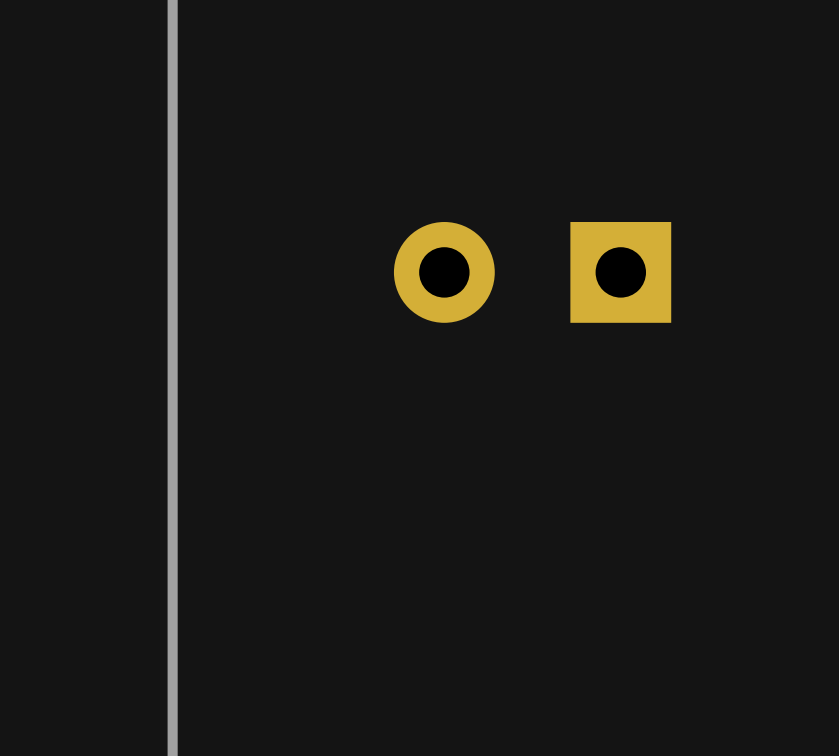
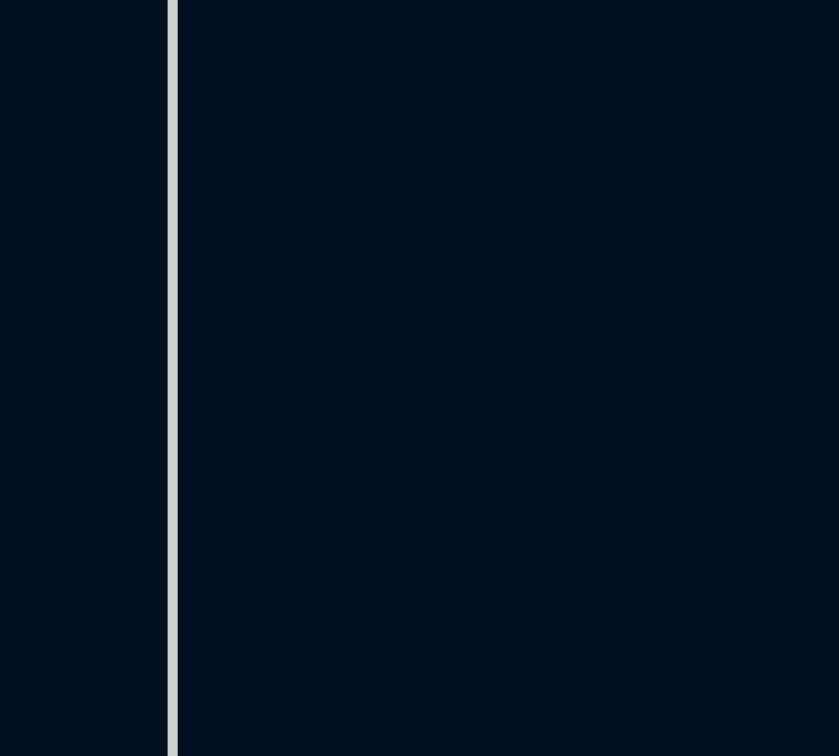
part: (532, 272) -> none

